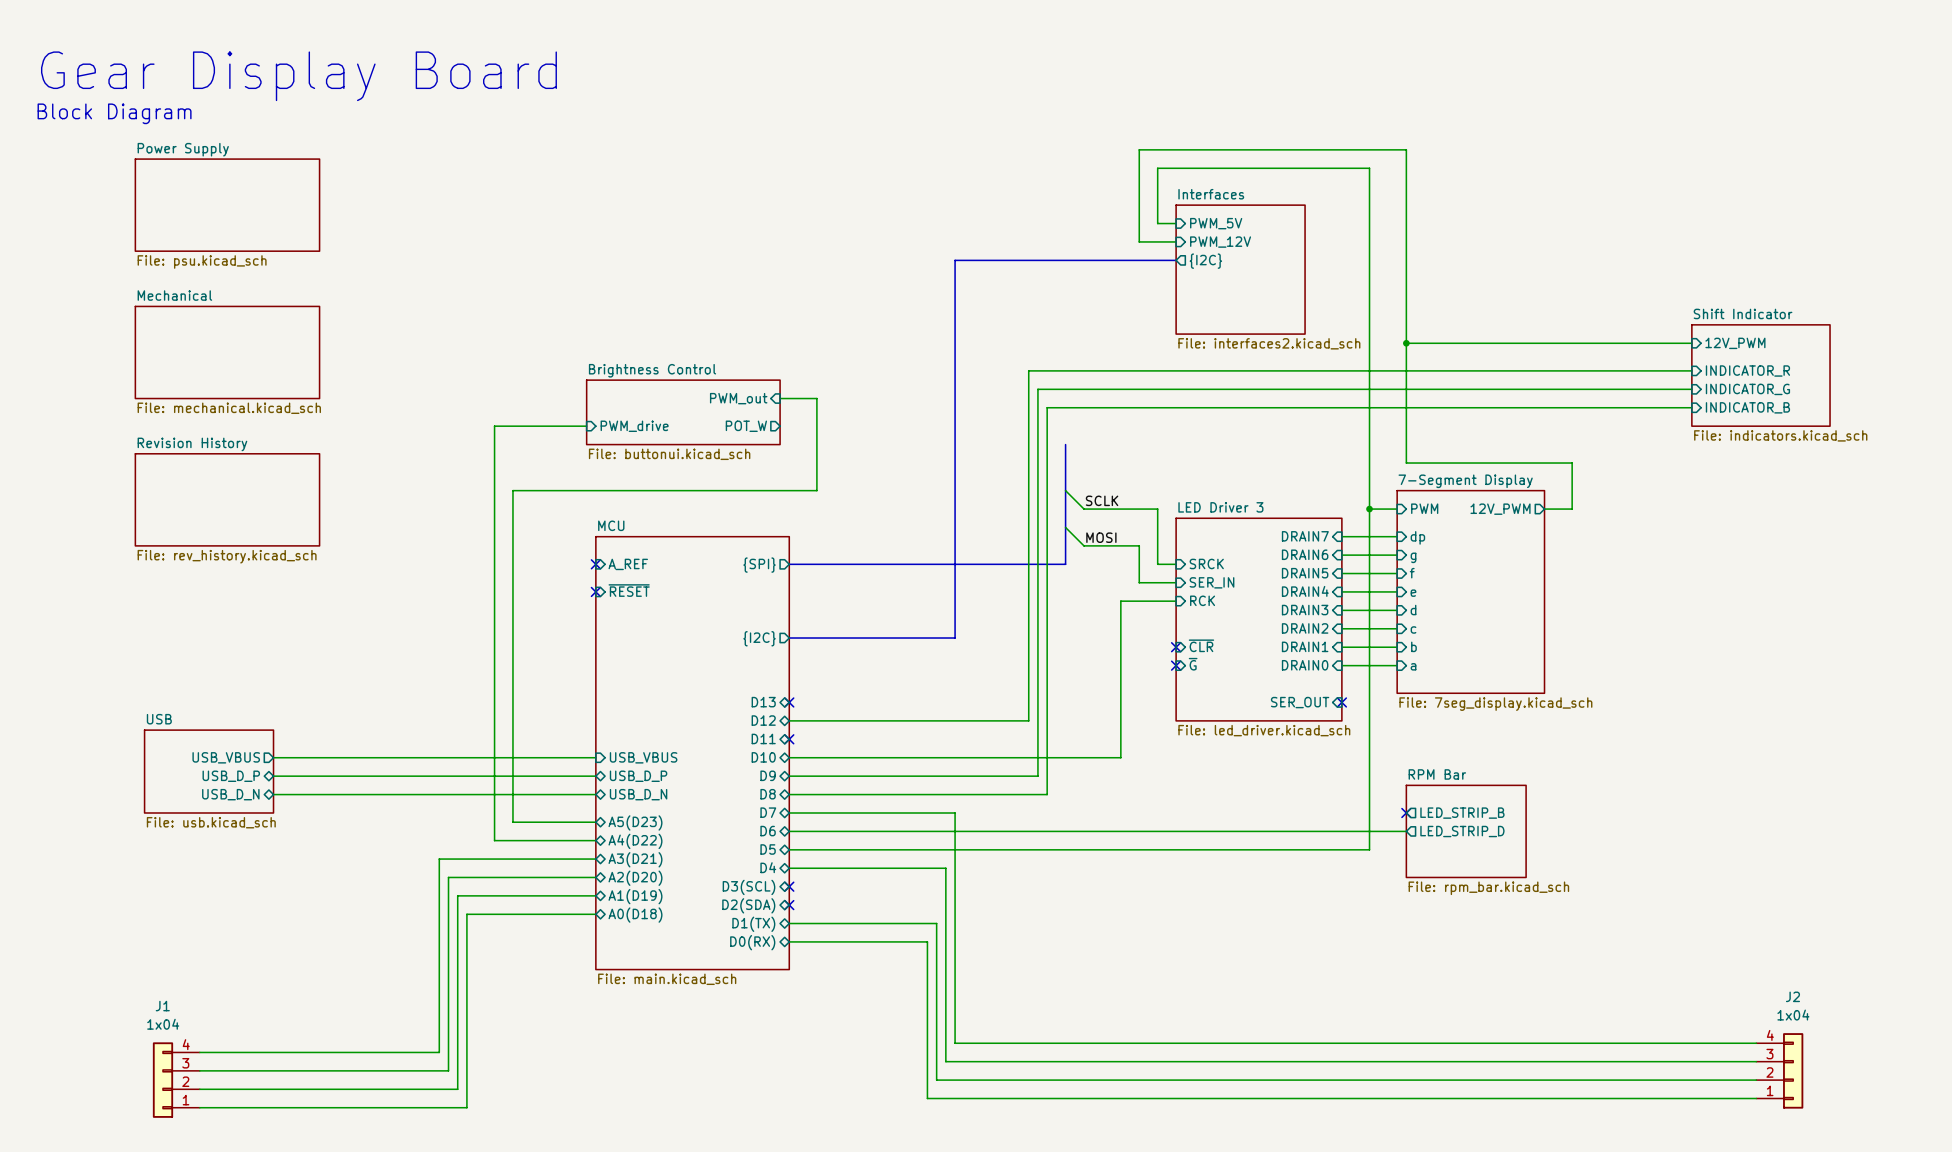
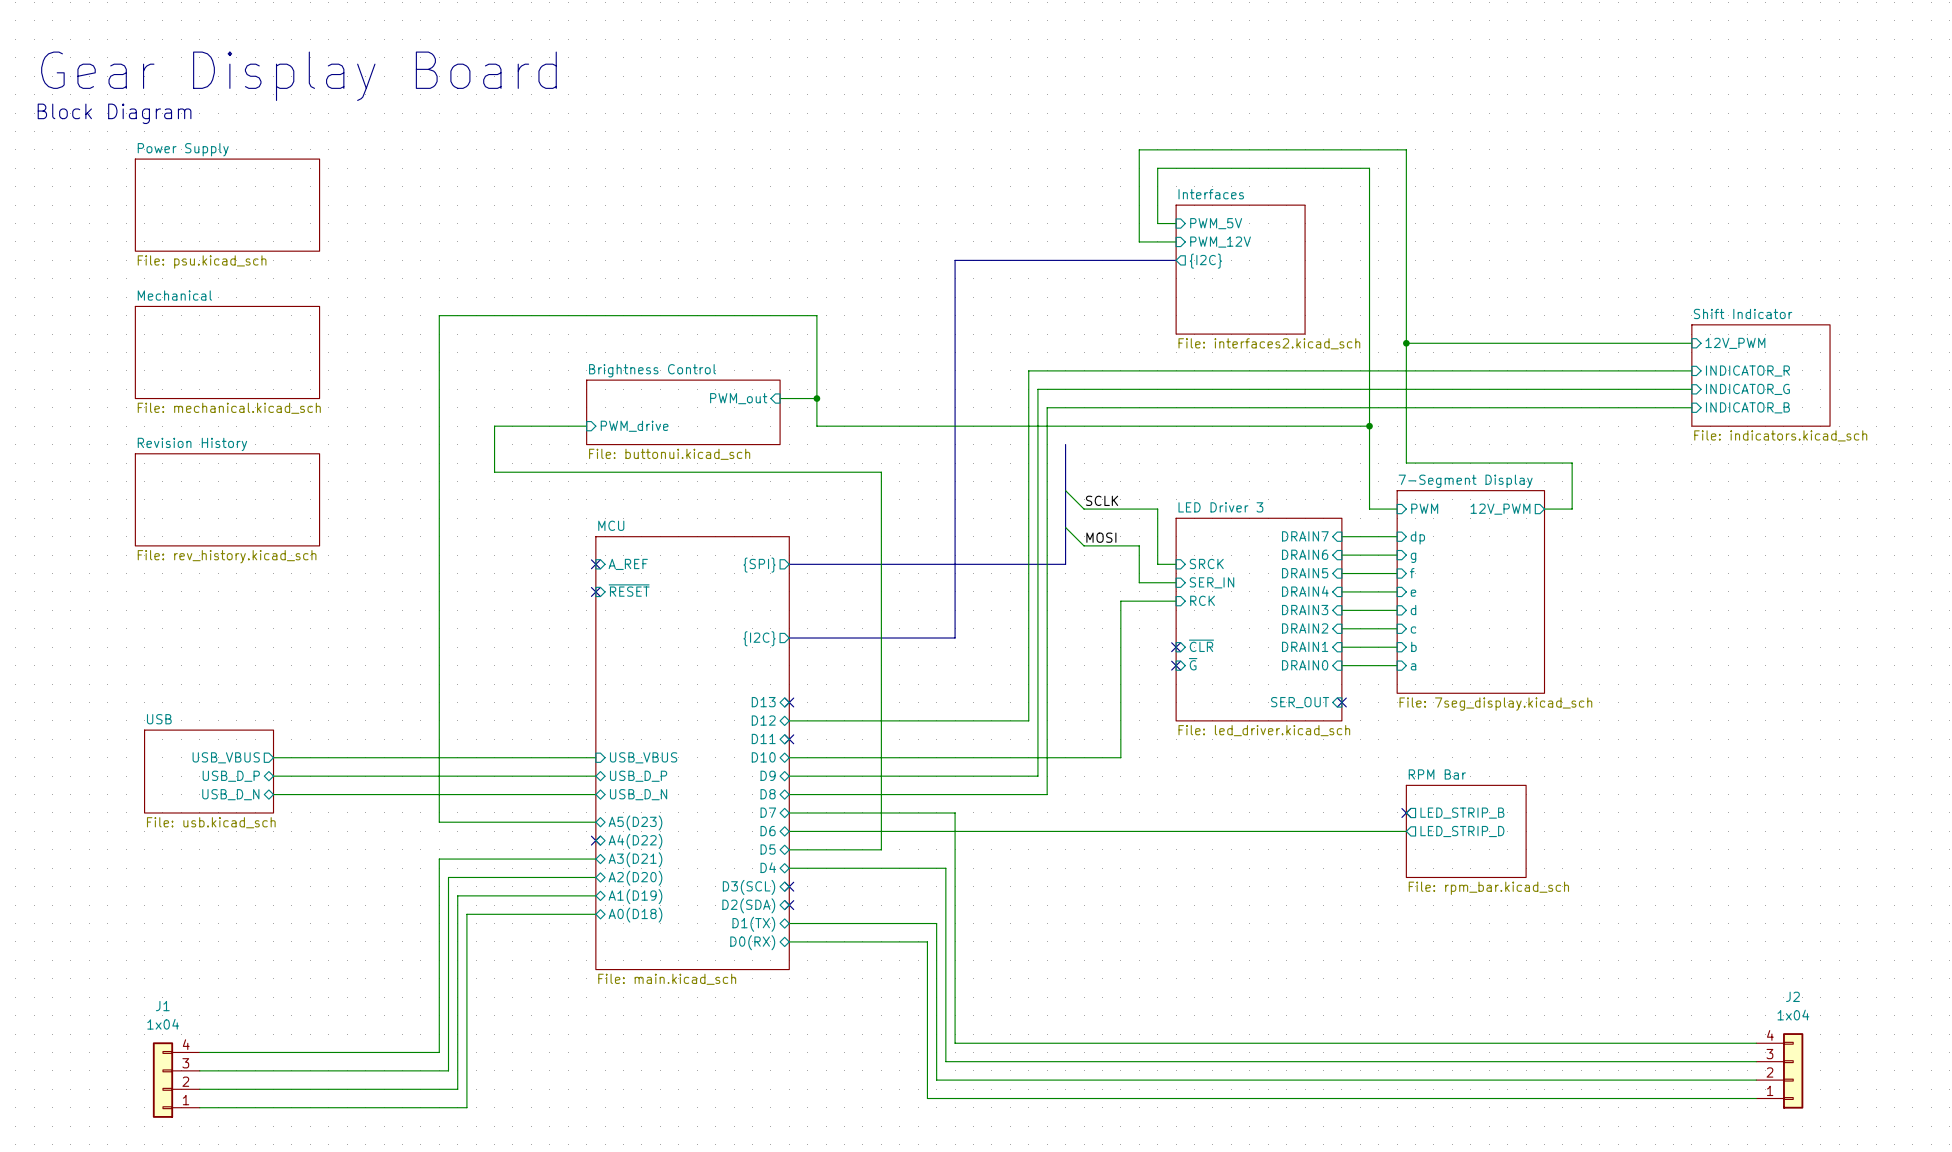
junction: none -> (816, 398)
sheet pin: POT_W (746, 426) -> none
wire: (816, 426) (816, 490) (512, 490) (512, 822) -> (816, 398) (816, 315) (439, 315) (439, 822) (512, 822)
wire: none -> (816, 426) (1369, 426)
junction: none -> (1369, 426)
wire: (494, 472) (494, 840) (595, 840) -> (494, 472) (881, 472) (881, 849)
wire: (1369, 509) (1369, 849) (881, 849) -> none
junction: (1369, 509) -> none
no-connect mark: none -> (595, 840)

